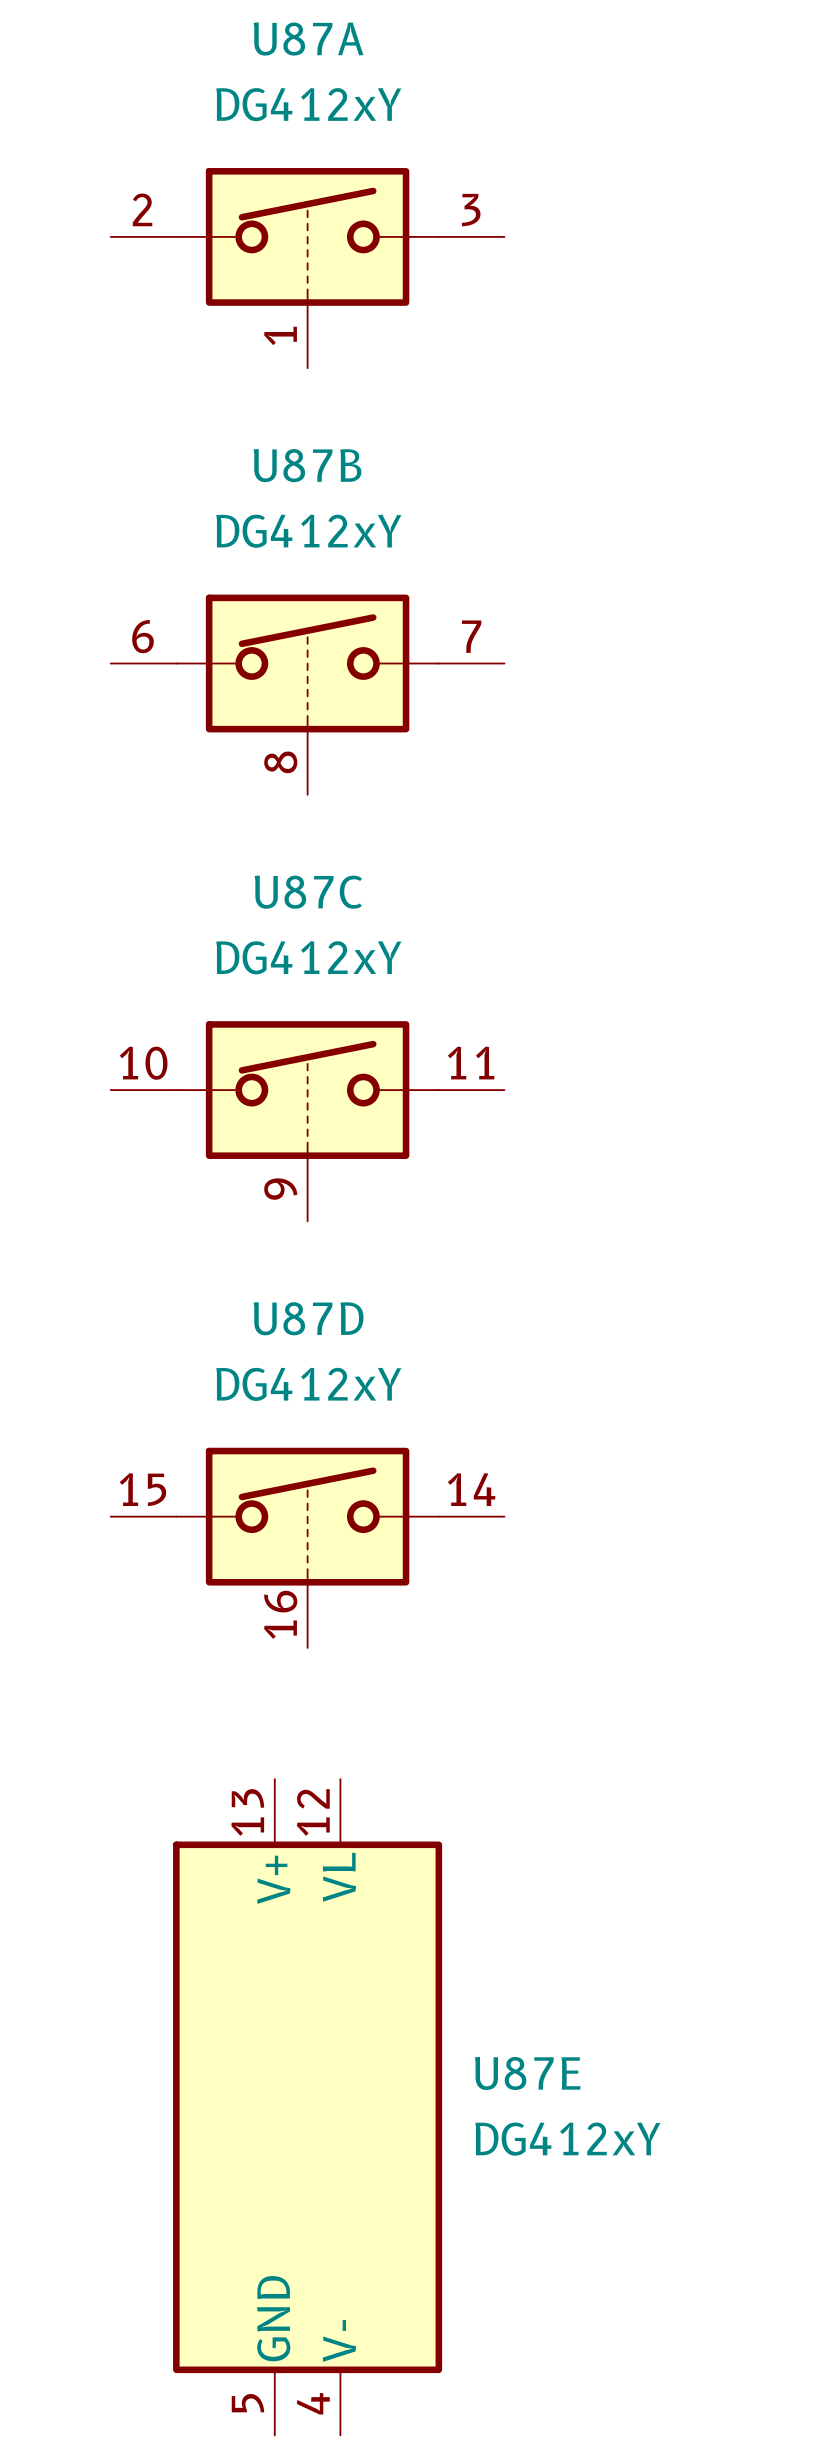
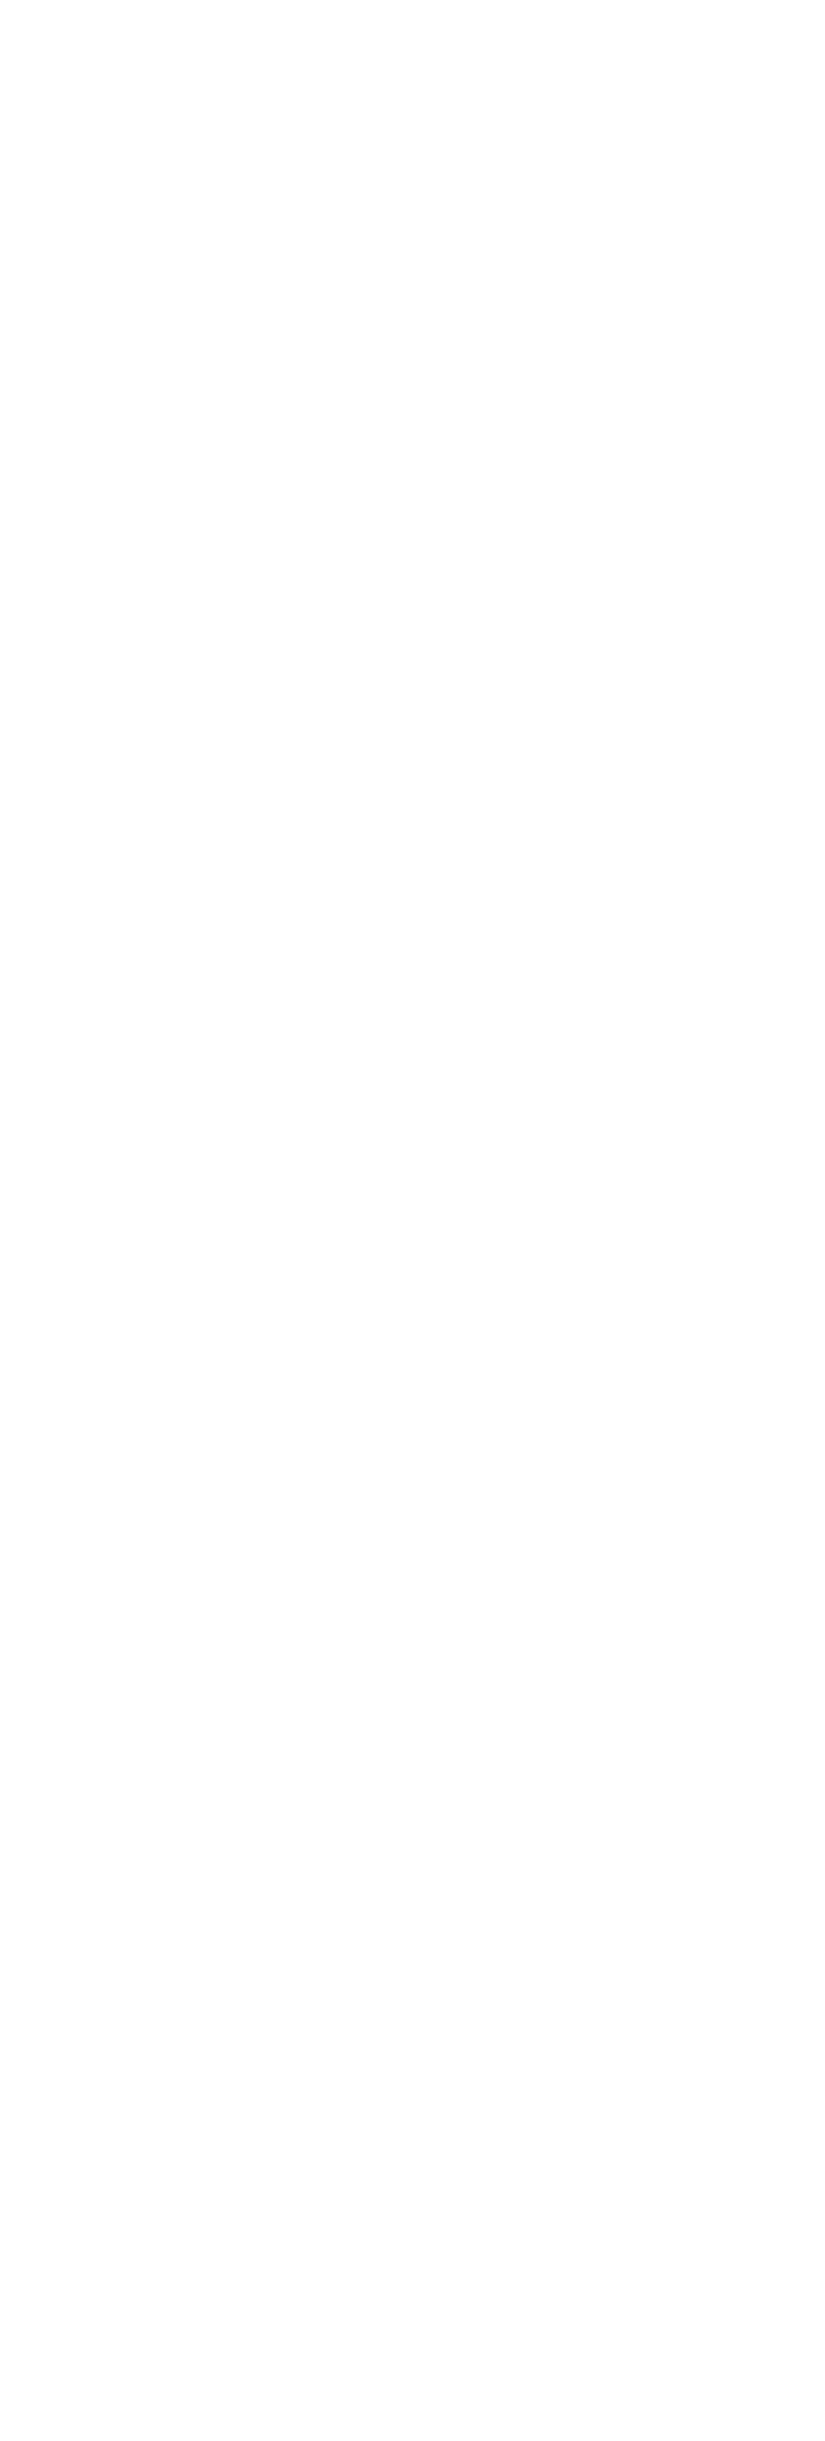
U87A: DG412xY (307, 268) -> none
U87B: DG412xY (307, 694) -> none
U87C: DG412xY (307, 1121) -> none
U87D: DG412xY (307, 1547) -> none
U87E: DG412xY (307, 2107) -> none

